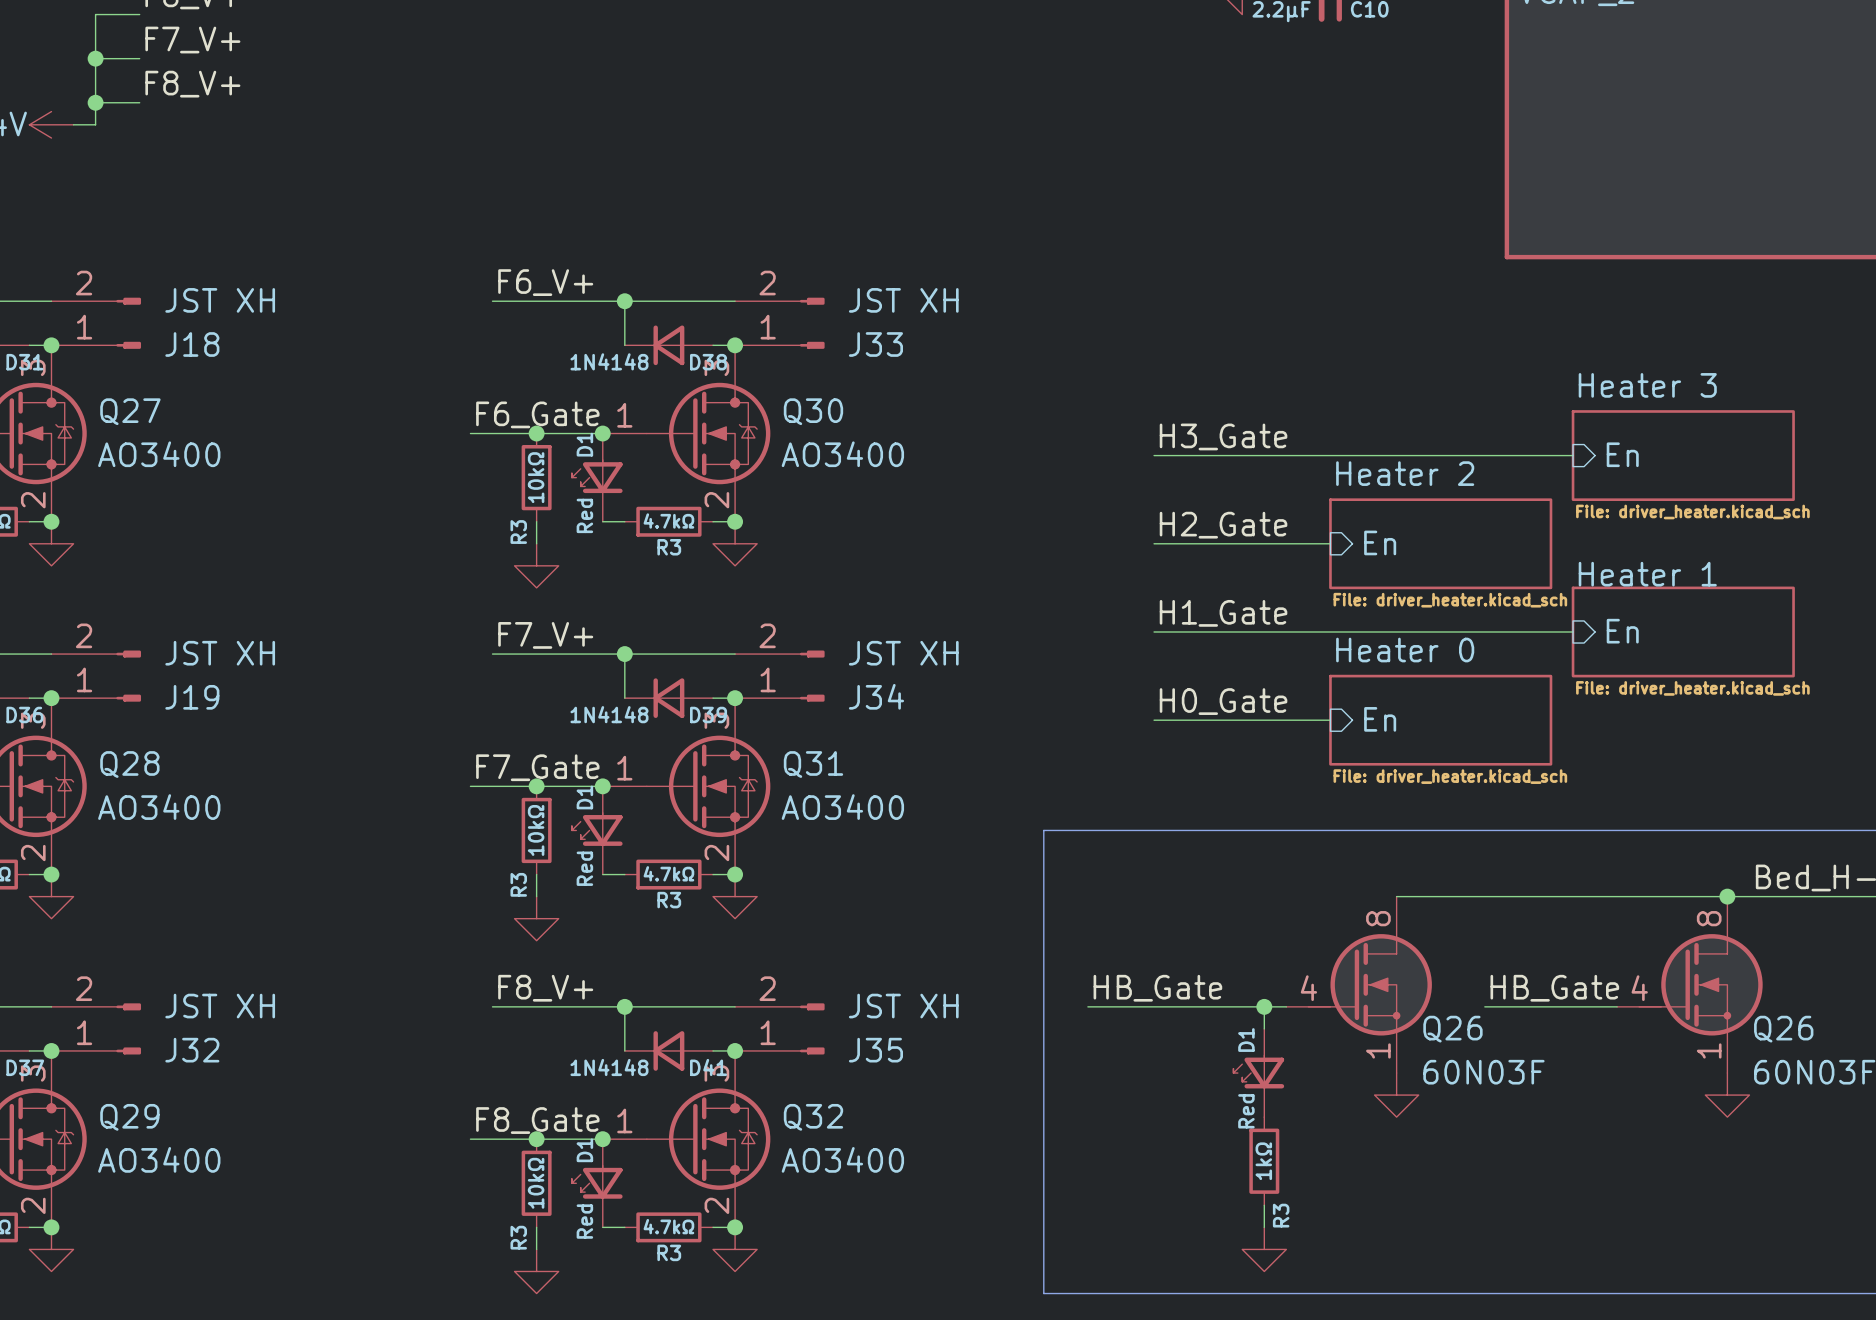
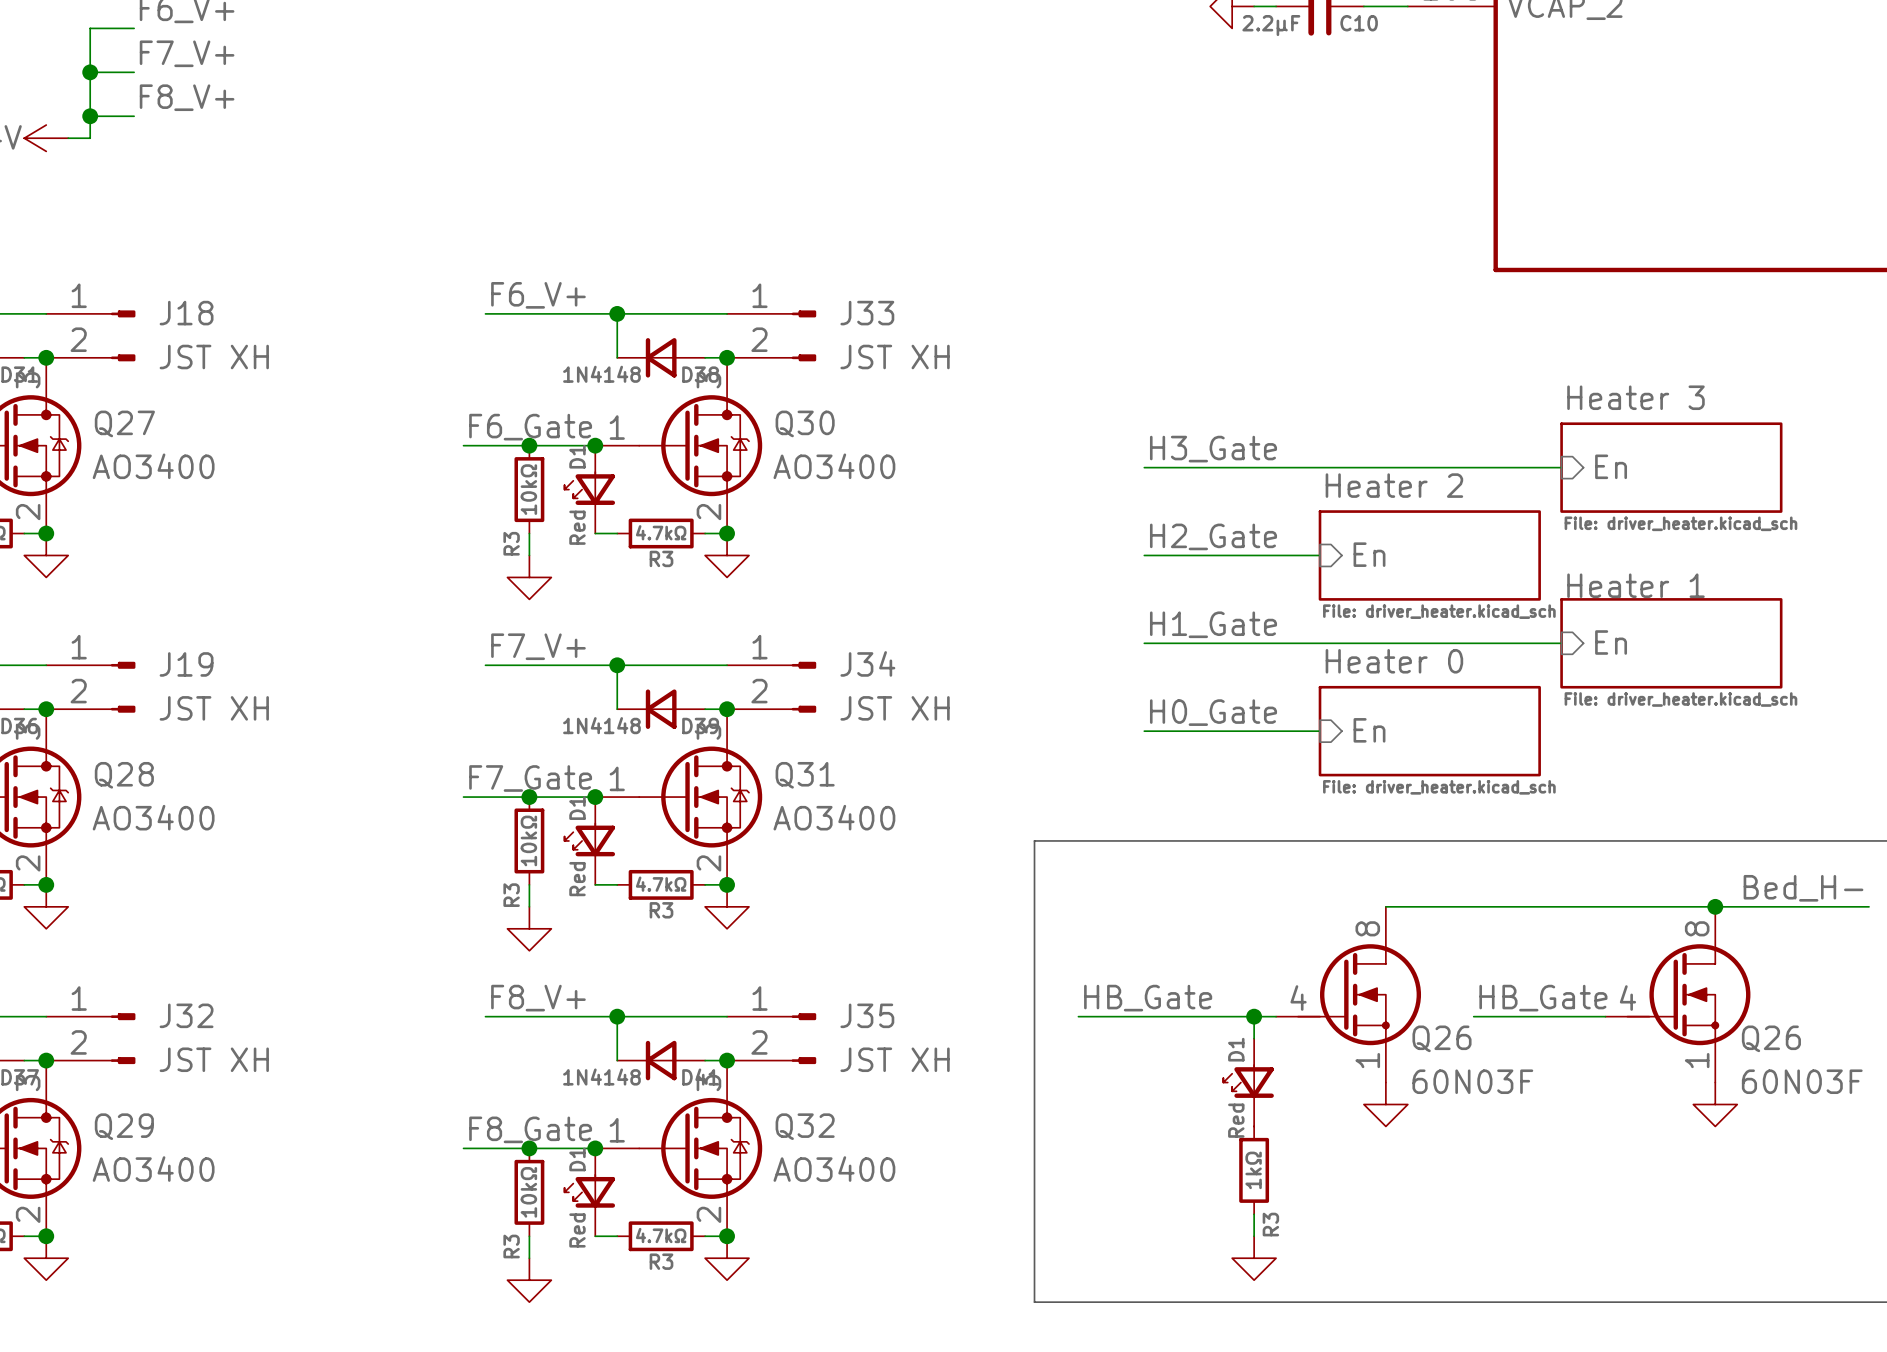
J18 flip: as is (128, 323) -> up-down (123, 335)
J33 flip: as is (812, 323) -> up-down (803, 335)
J19 flip: as is (128, 676) -> up-down (123, 687)
J34 flip: as is (812, 676) -> up-down (803, 687)
J32 flip: as is (128, 1028) -> up-down (123, 1038)
J35 flip: as is (812, 1028) -> up-down (803, 1038)

